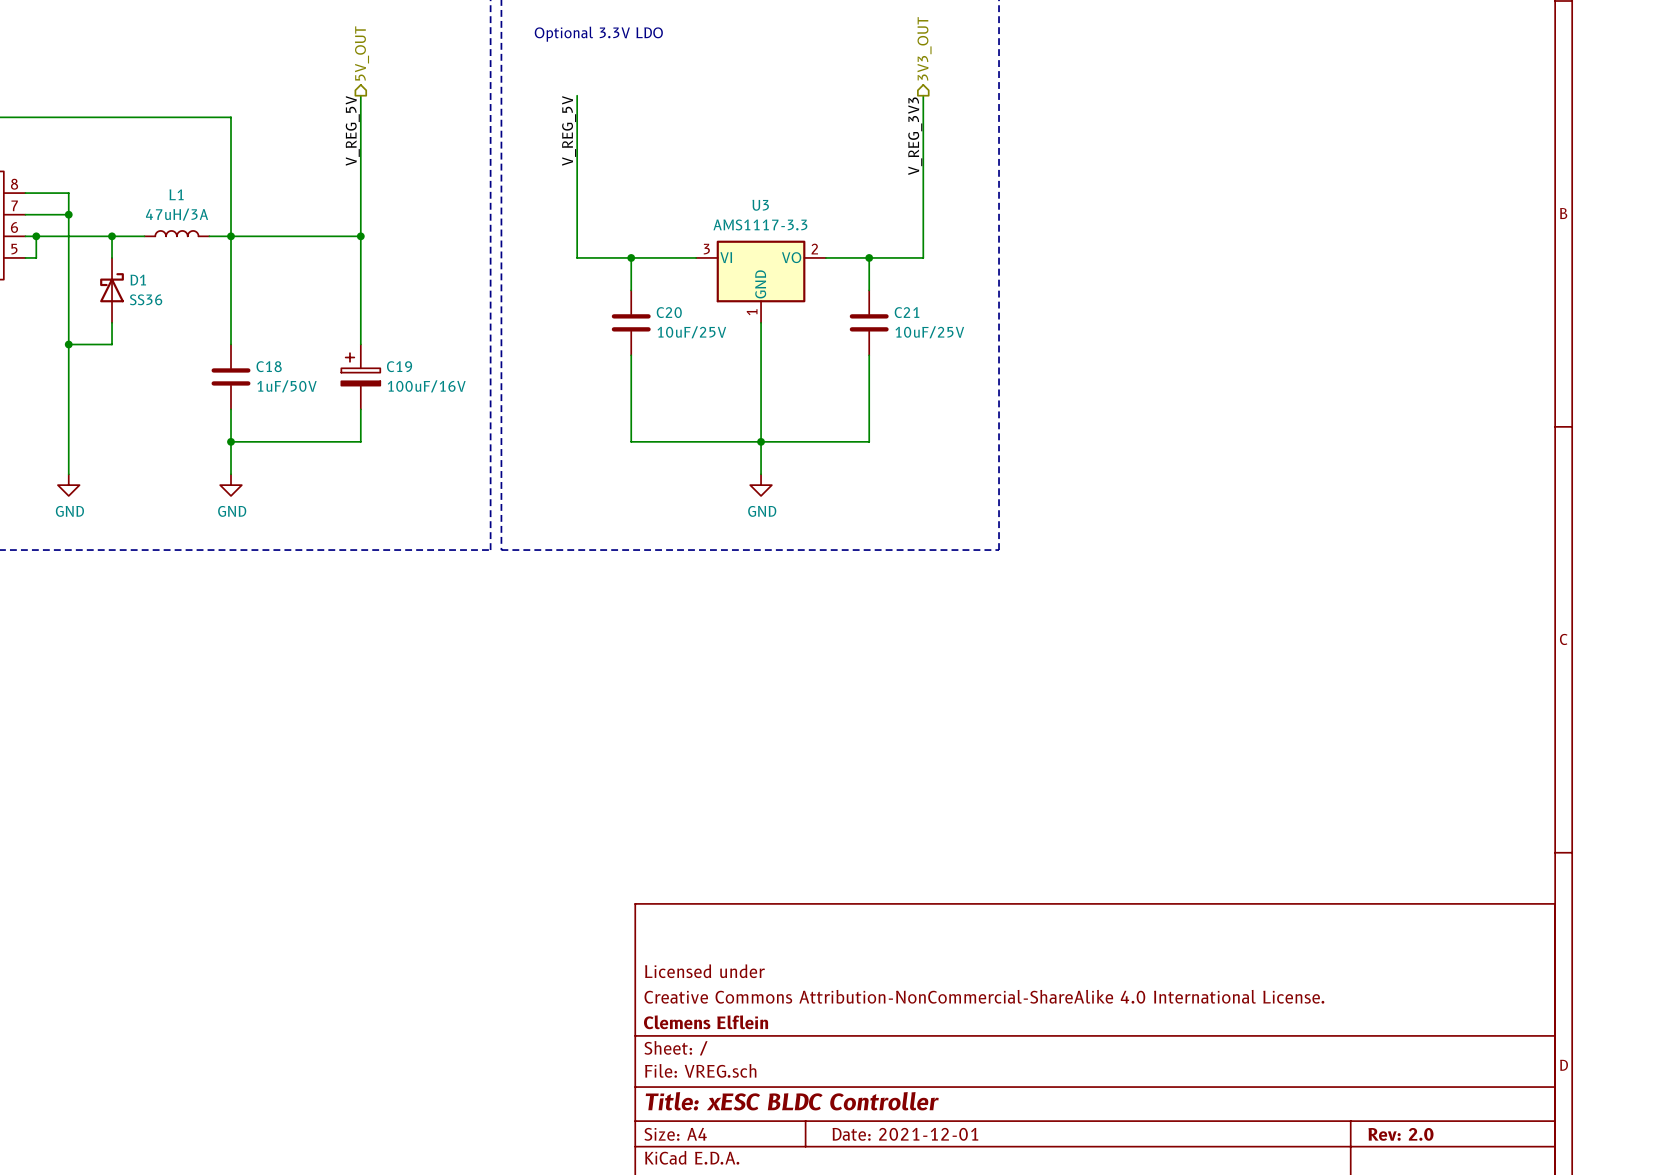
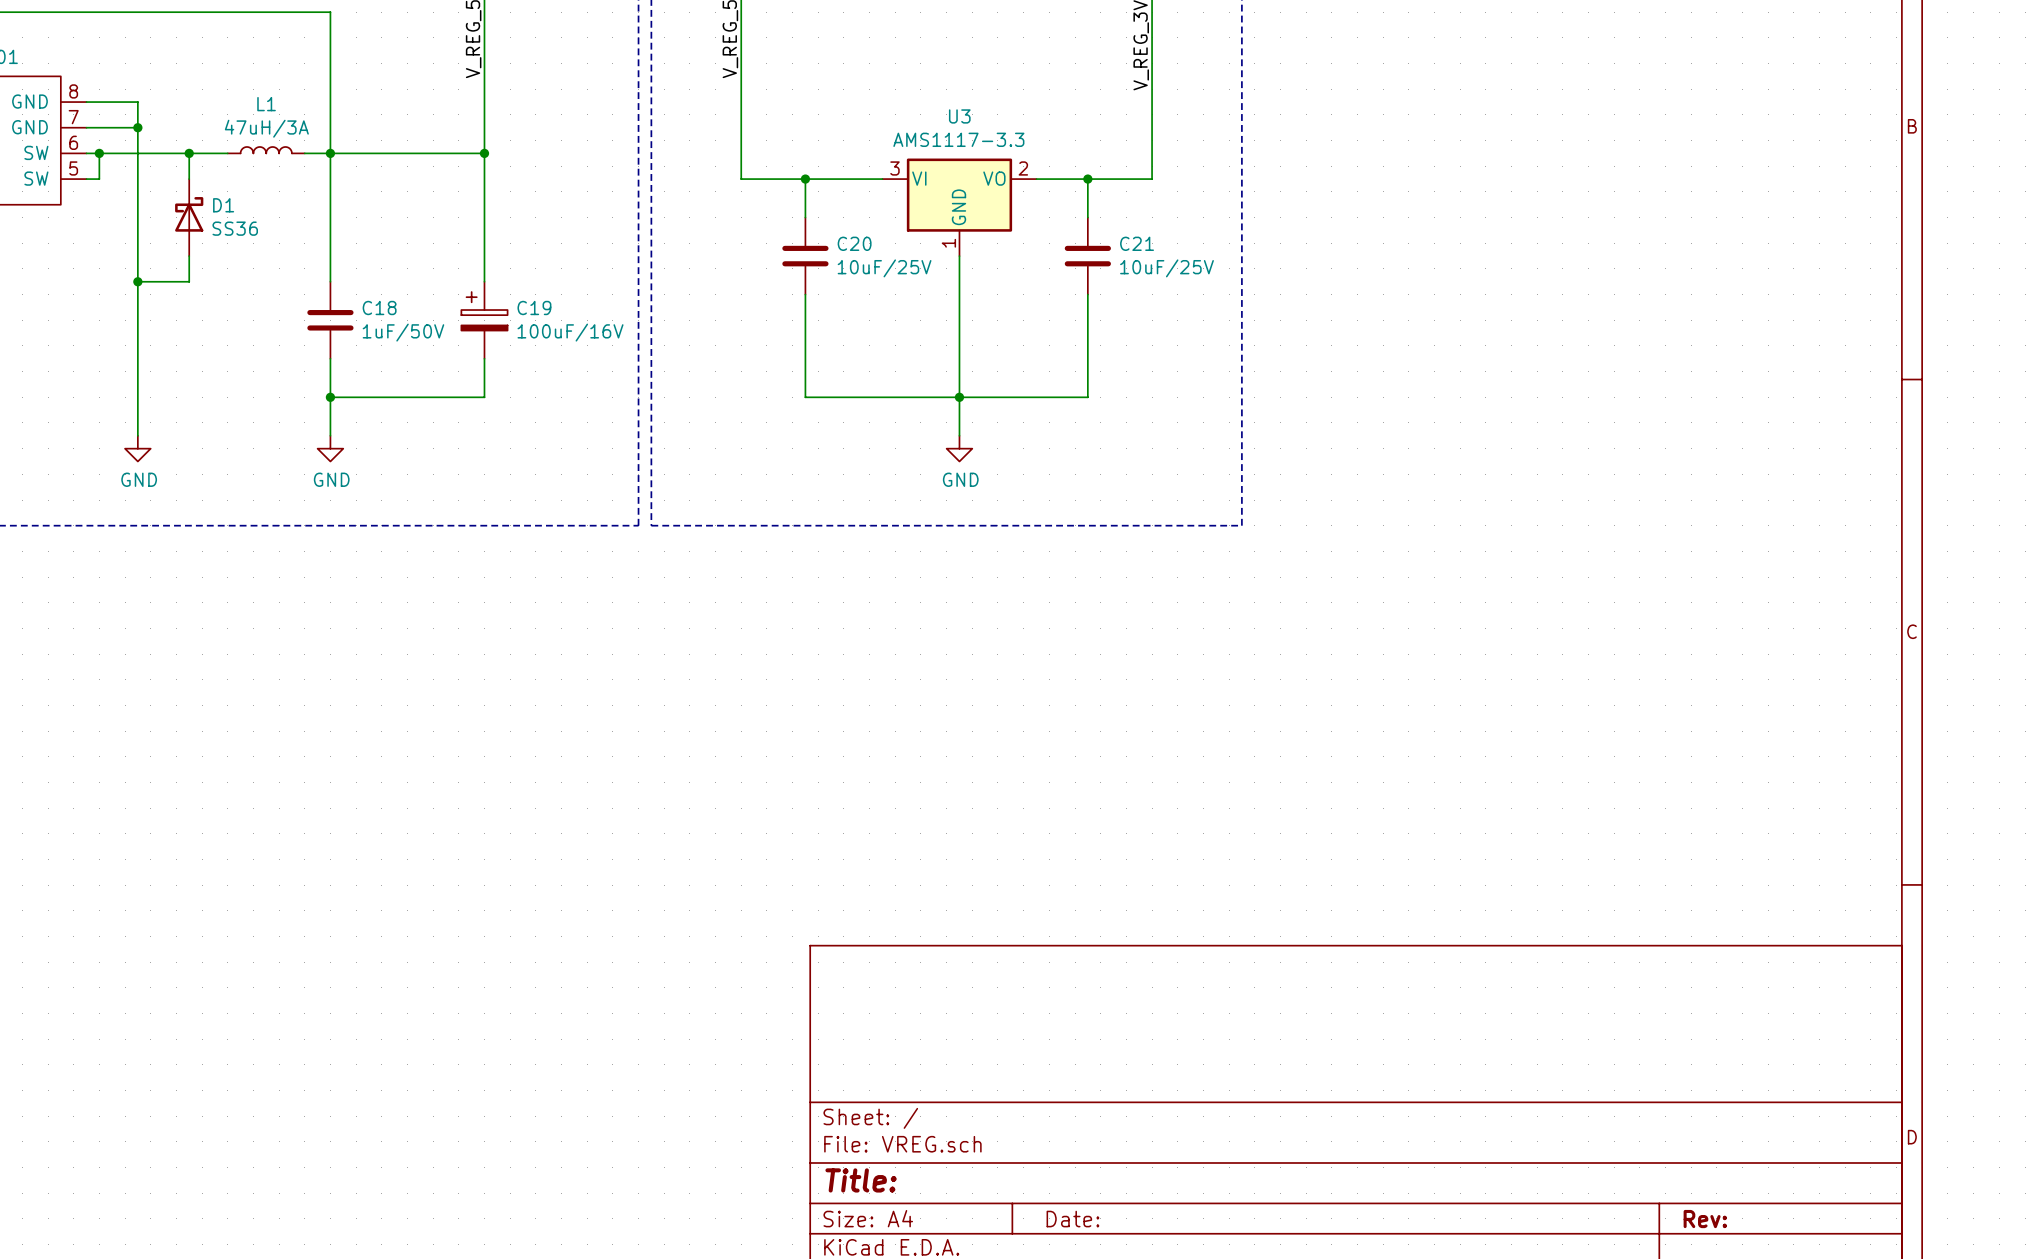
title block: Licensed under (704, 971) -> none
title block: Creative Commons Attribution-NonCommercial-ShareAlike 4.0 International License. (984, 996) -> none
title block: Clemens Elflein (706, 1022) -> none
title block: Title: xESC BLDC Controller (792, 1101) -> Title: (861, 1180)
title block: Date: 2021-12-01 (905, 1134) -> Date: (1072, 1219)
title block: Rev: 2.0 (1400, 1134) -> Rev: (1705, 1219)

